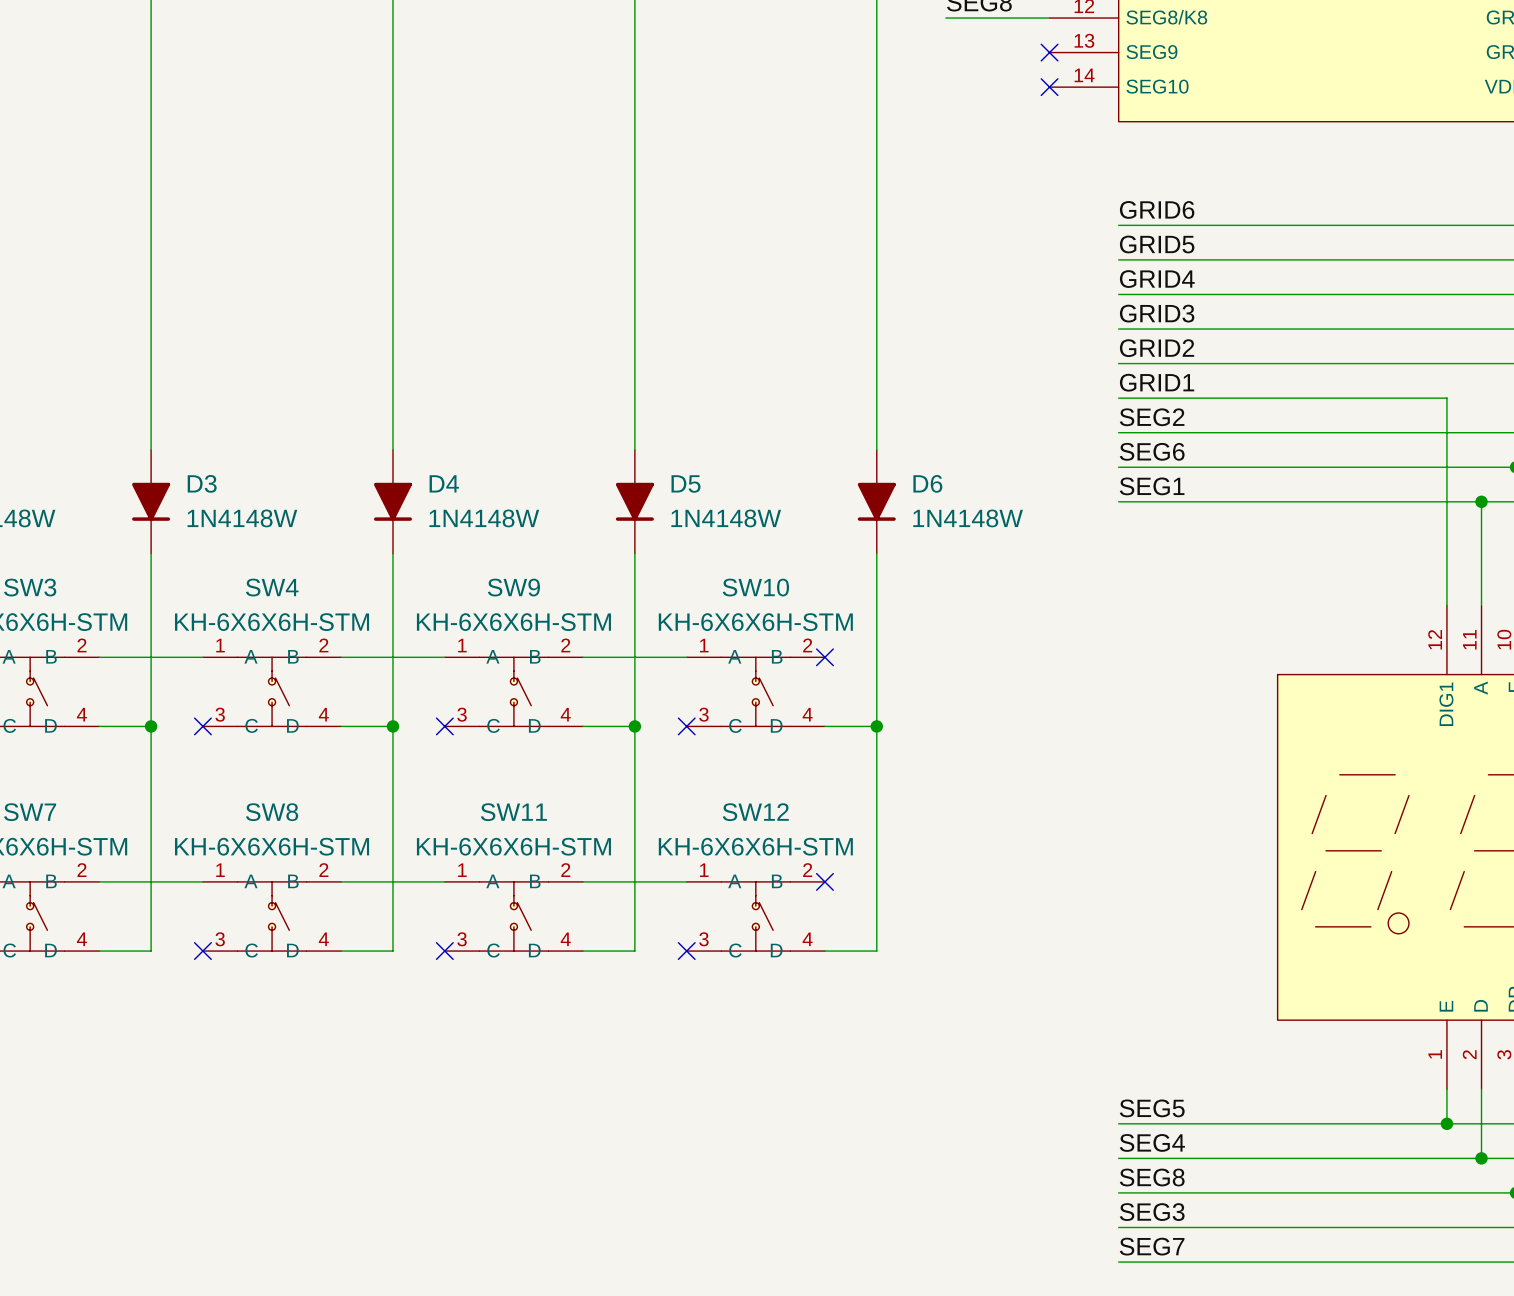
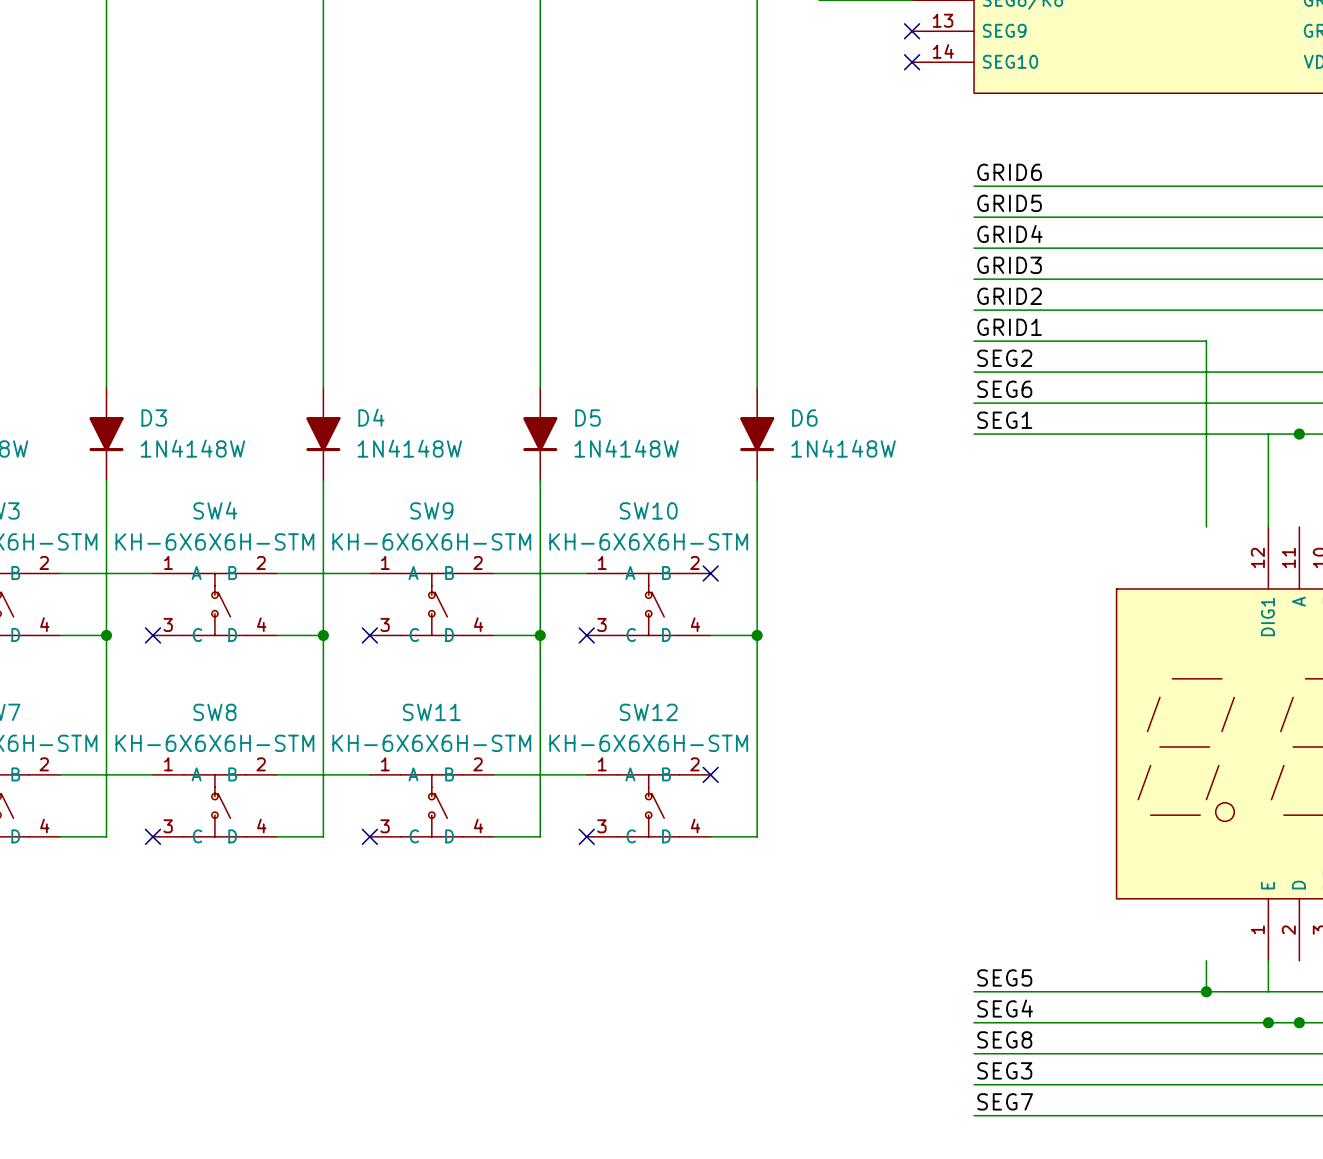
wire: (1377, 398) (1446, 398) (1446, 501) -> (1206, 341) (1206, 527)
wire: (1481, 501) (1481, 605) -> none
wire: none -> (1206, 960) (1206, 991)
wire: (1481, 1089) (1481, 1158) -> none
junction: none -> (1206, 991)
junction: (1446, 1123) -> none
junction: none -> (1268, 1022)

